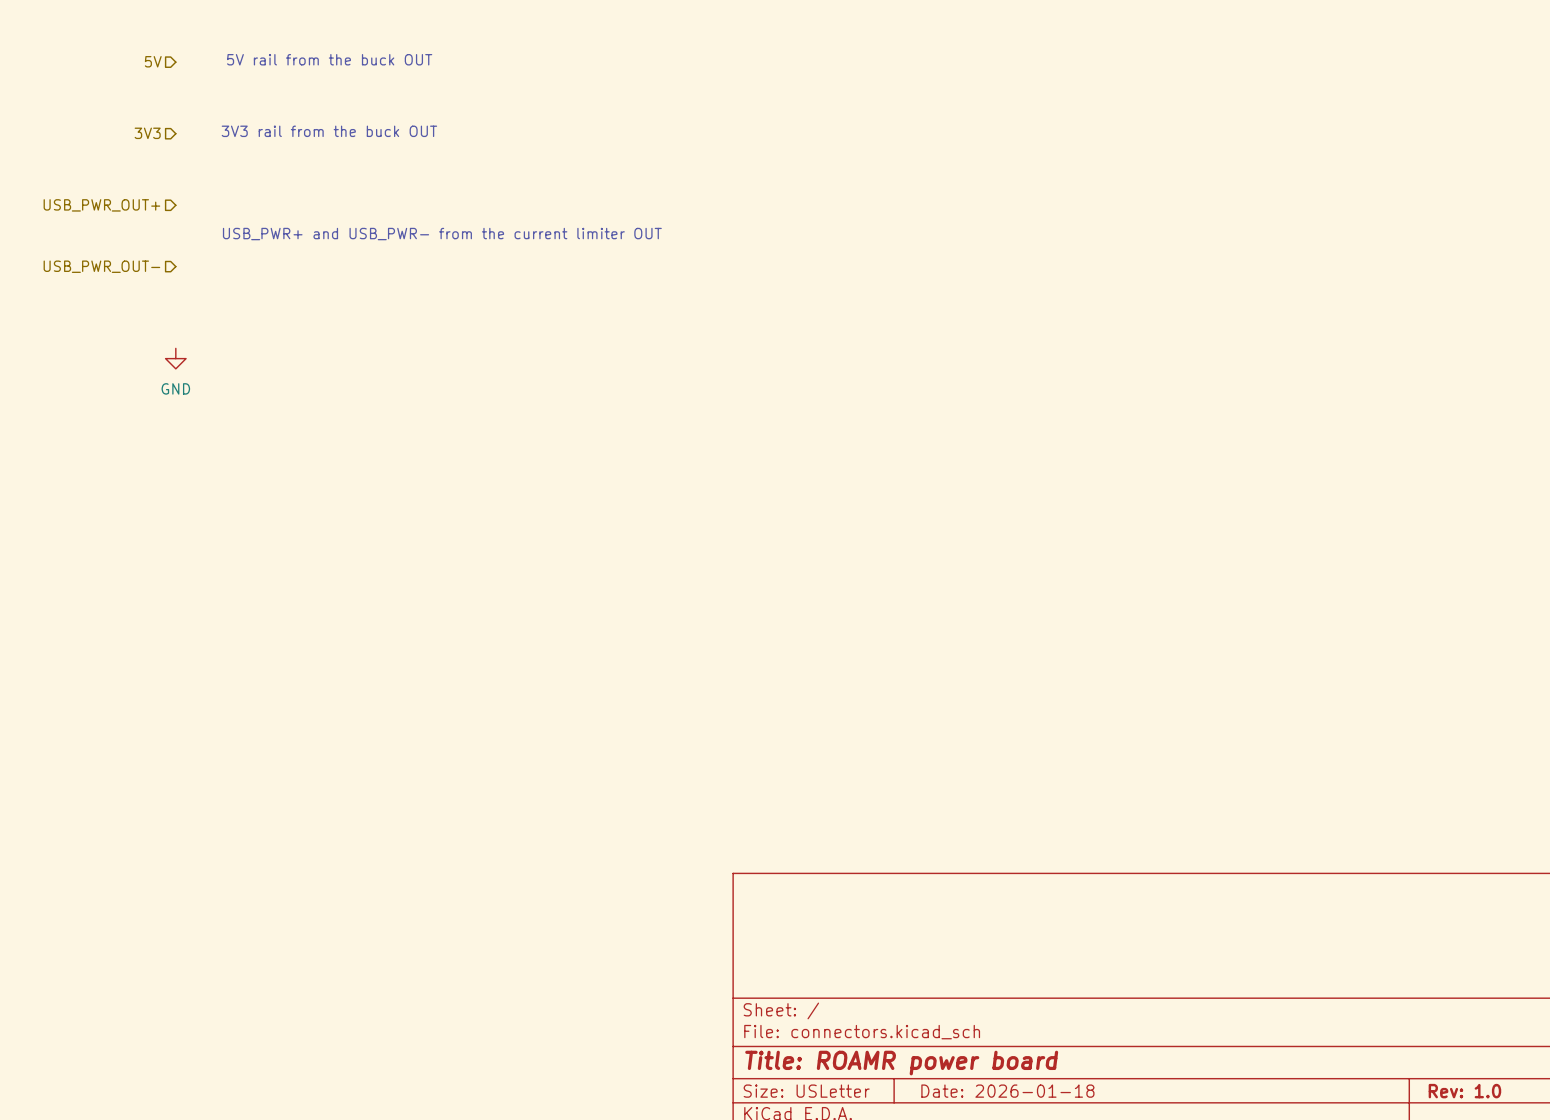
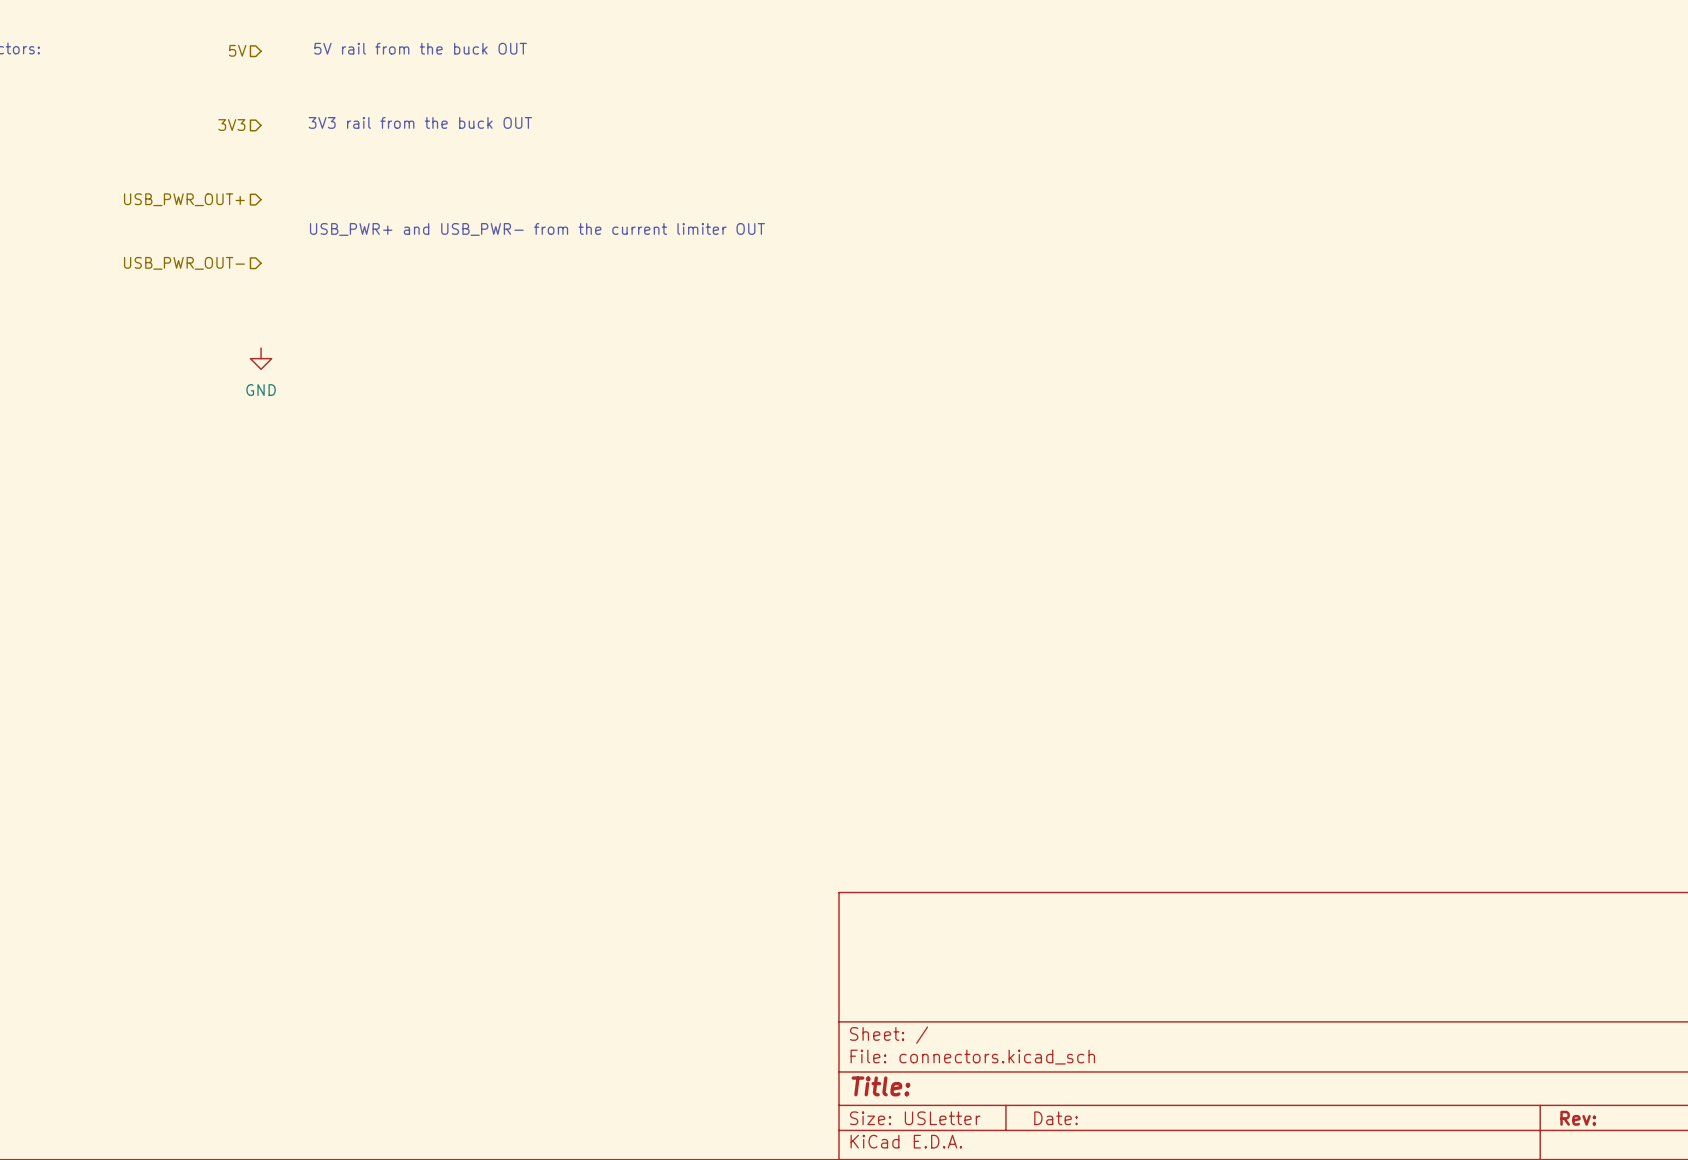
title block: Title: ROAMR power board (901, 1063) -> Title: (880, 1086)
title block: Date: 2026-01-18 (1007, 1091) -> Date: (1055, 1118)
title block: Rev: 1.0 (1464, 1091) -> Rev: (1578, 1118)

